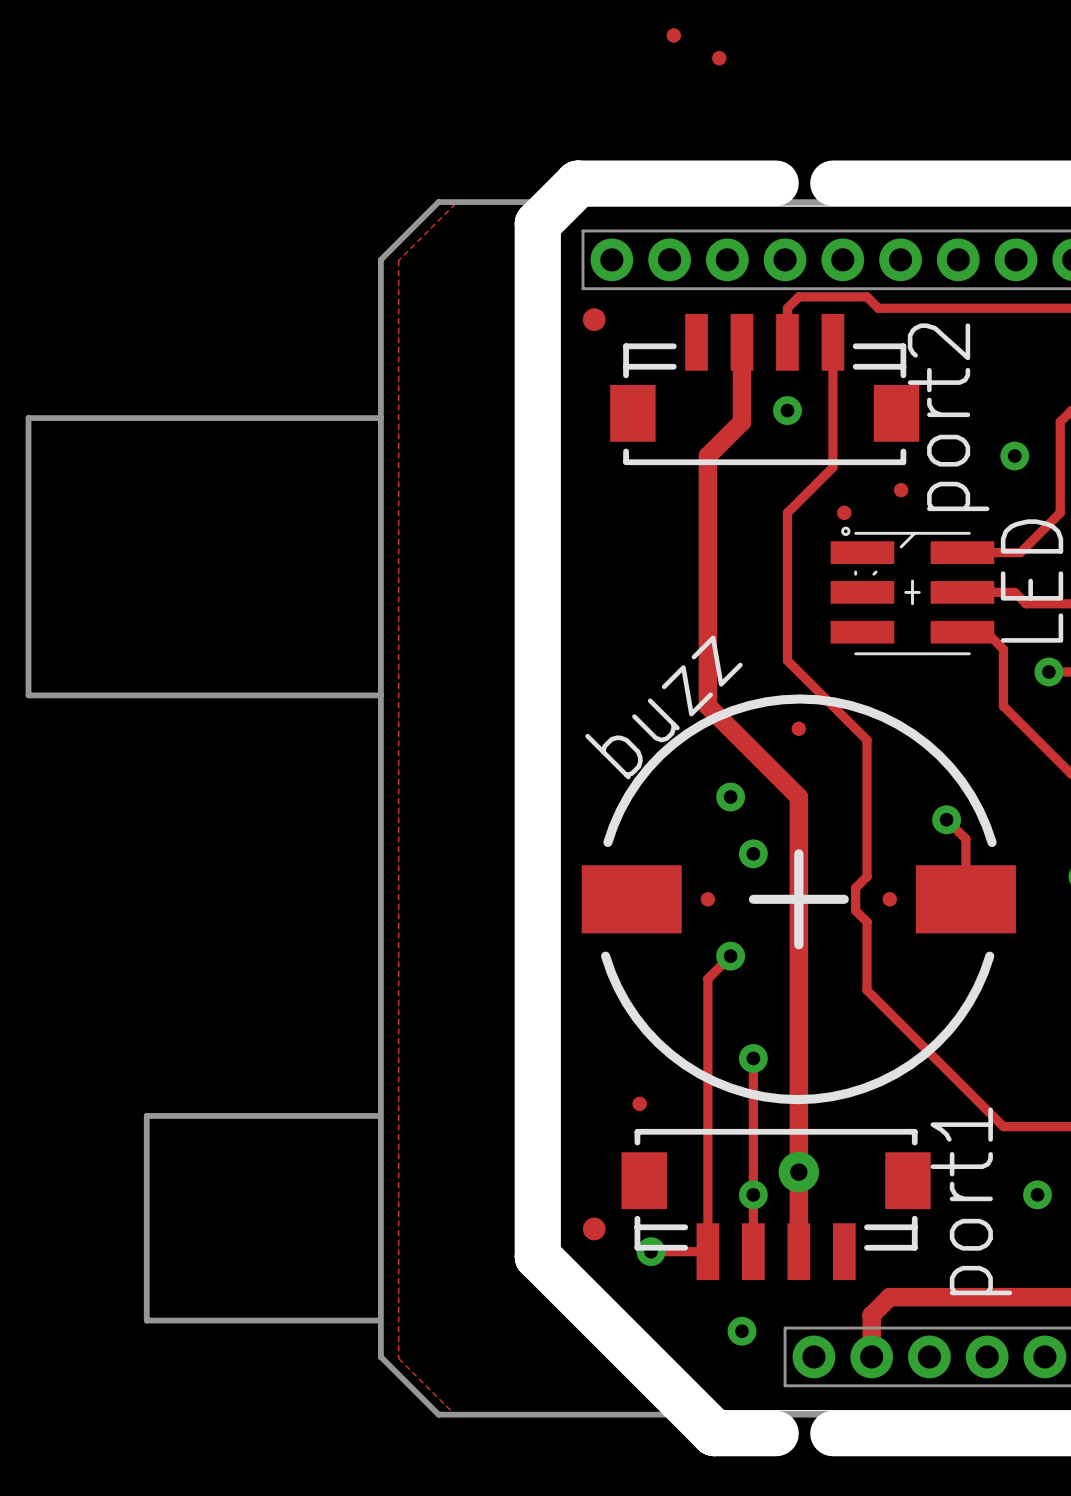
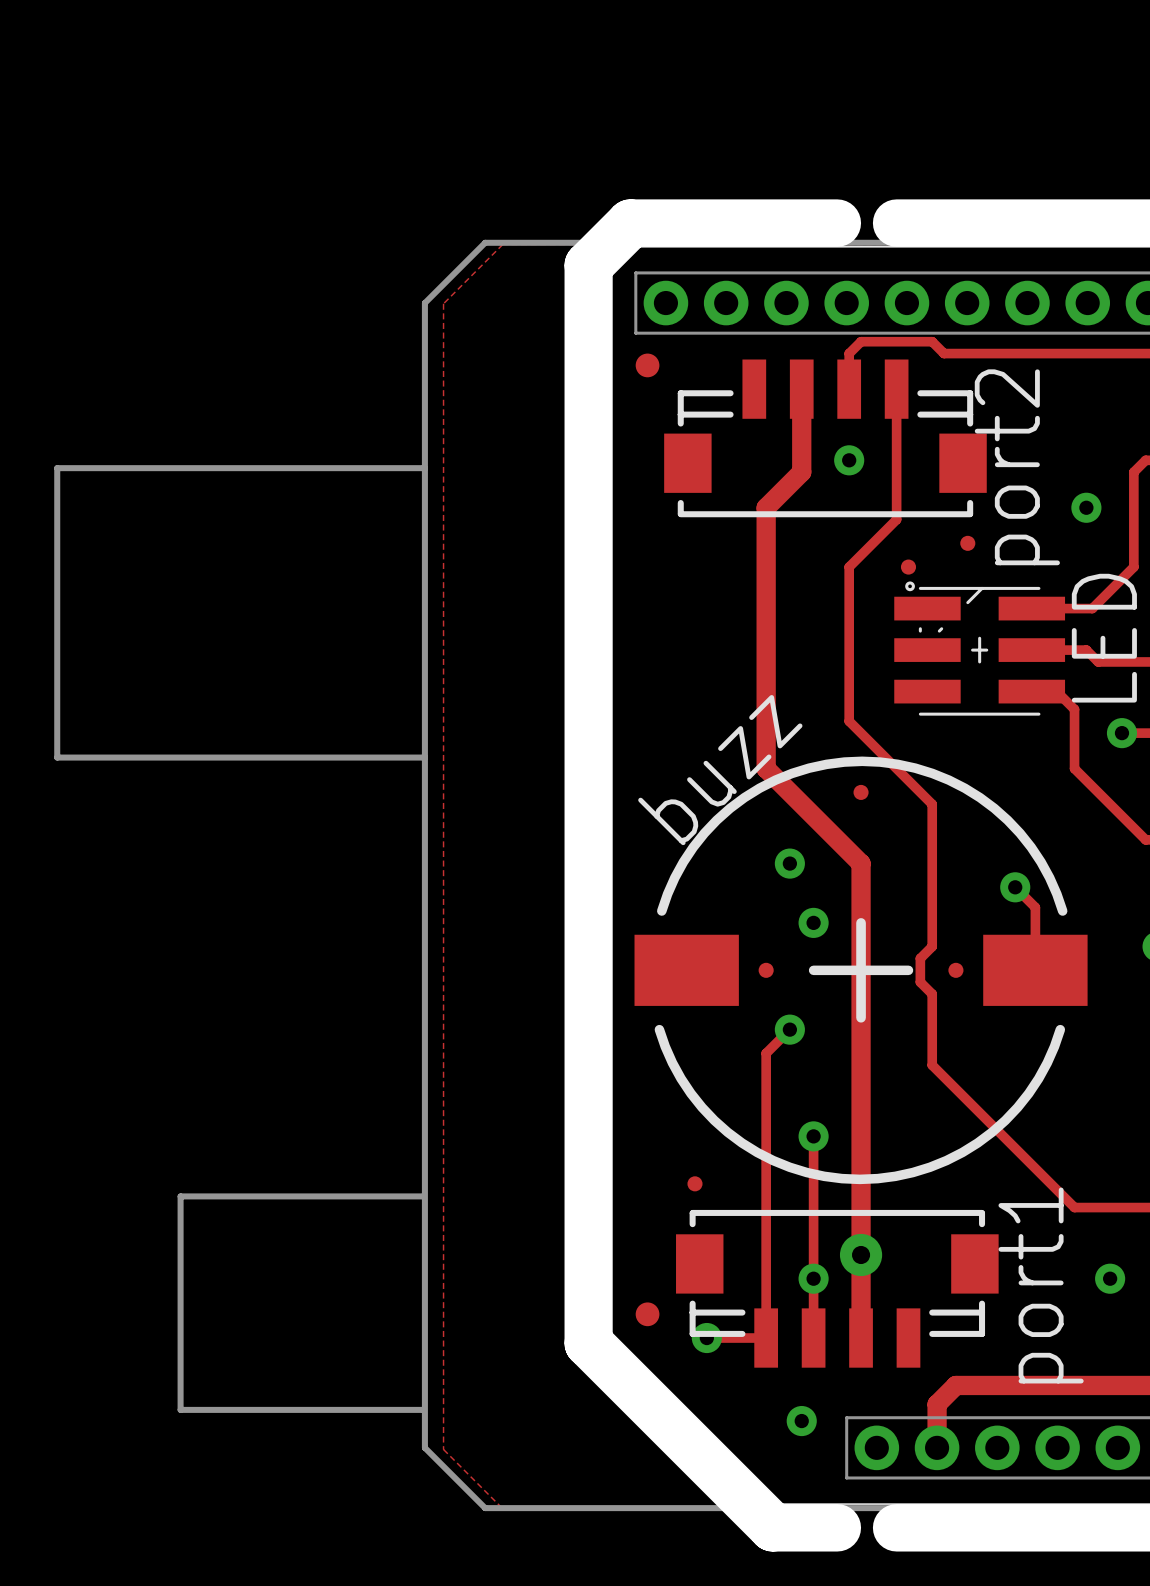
part: (673, 35) -> none
part: (719, 58) -> none

